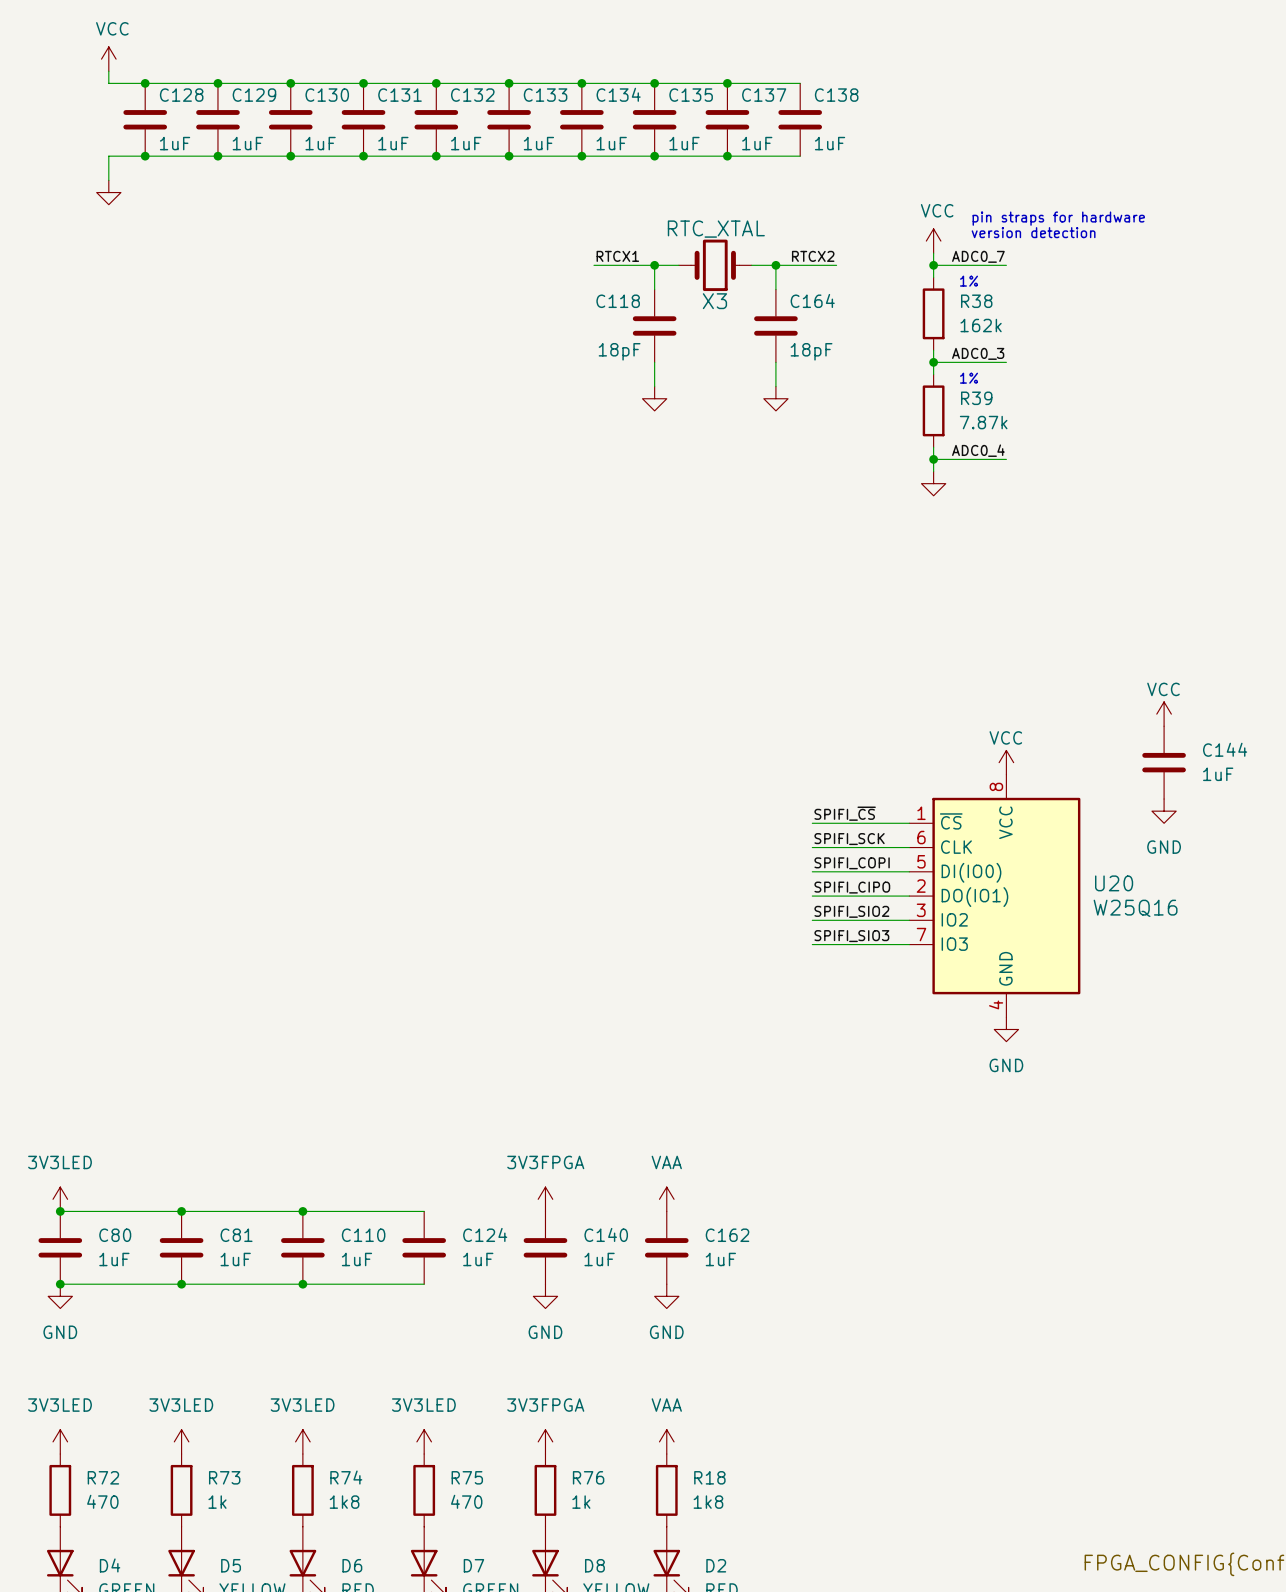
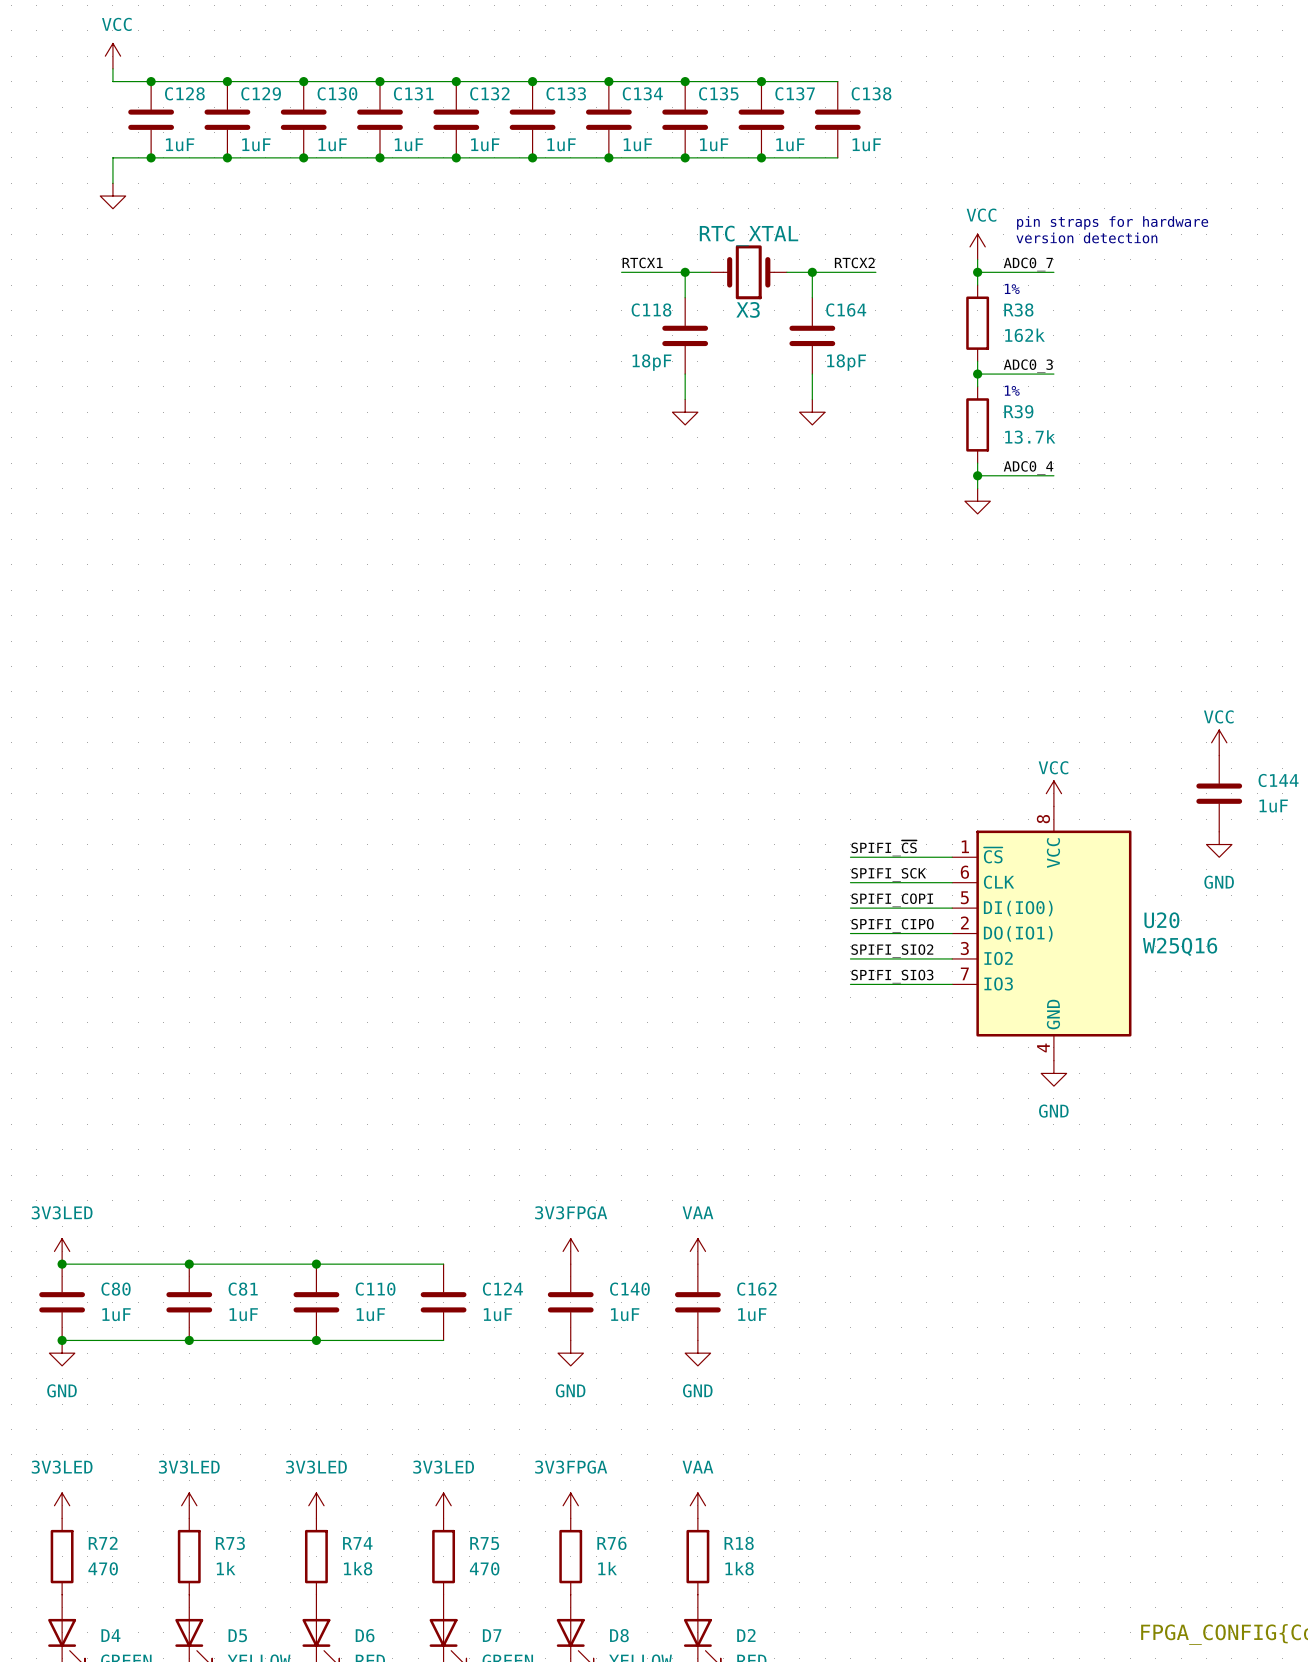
R39 value: 7.87k (983, 422) -> 13.7k (1030, 437)

